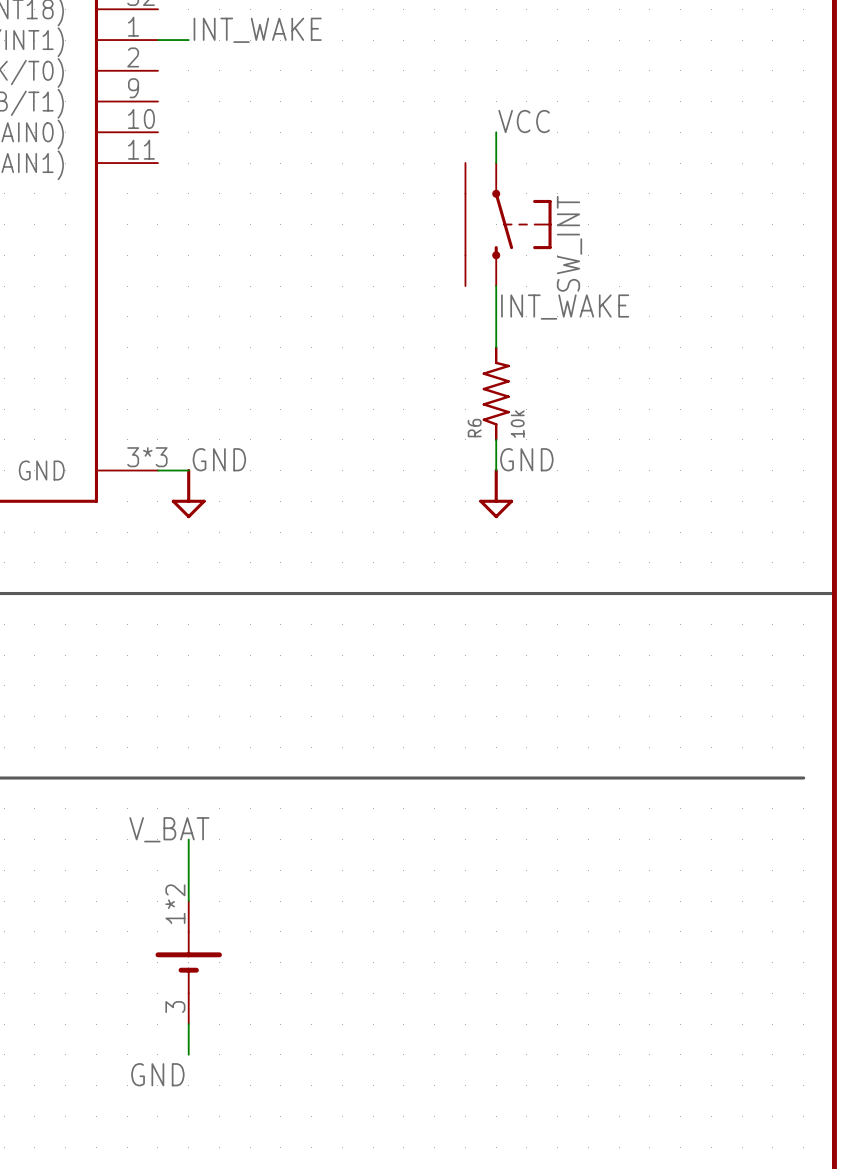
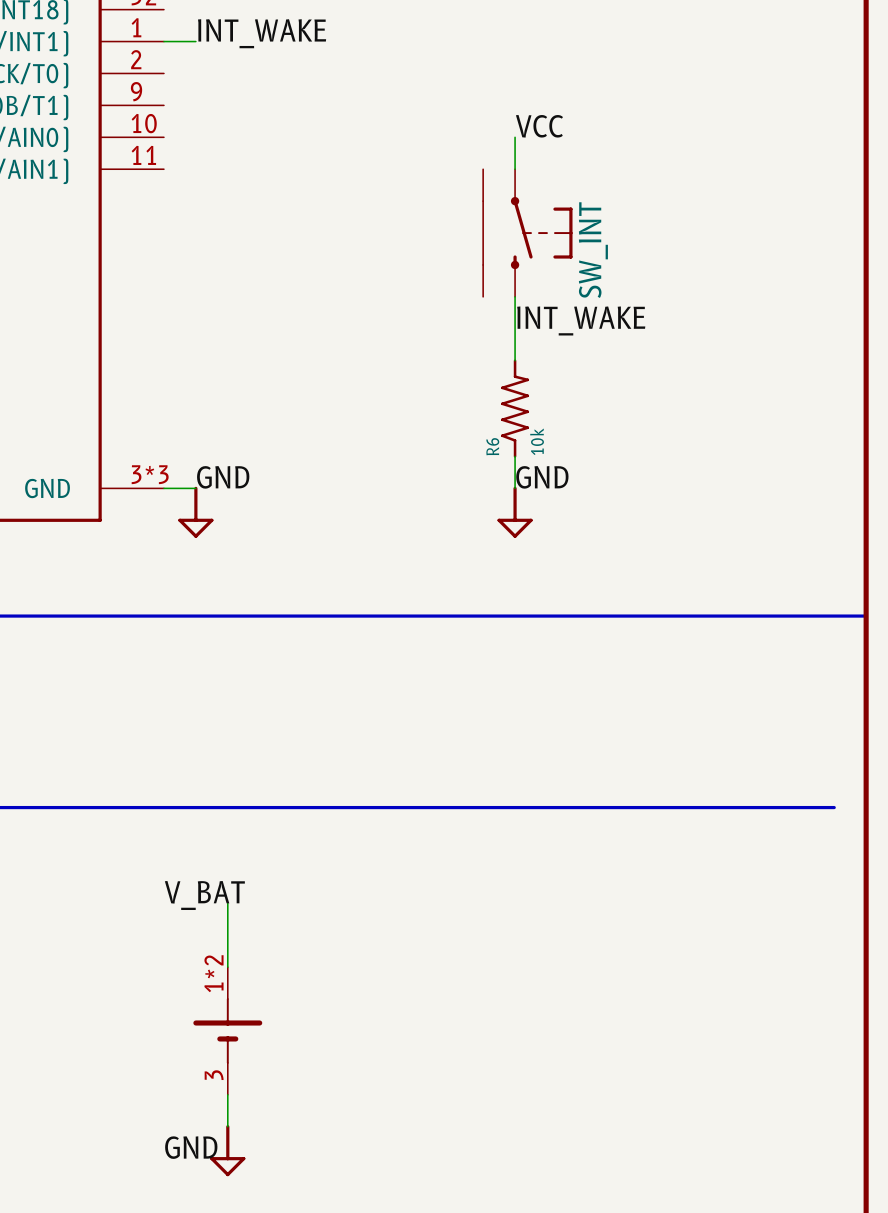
label position: V_BAT (169, 829) -> V_BAT (204, 895)
wire: (188, 839) (188, 901) -> (227, 903) (227, 967)
part position: (188, 962) -> (227, 1030)
wire: (188, 1024) (188, 1054) -> (227, 1094) (227, 1126)
label position: GND (157, 1074) -> GND (191, 1147)
power symbol: none -> (227, 1150)

